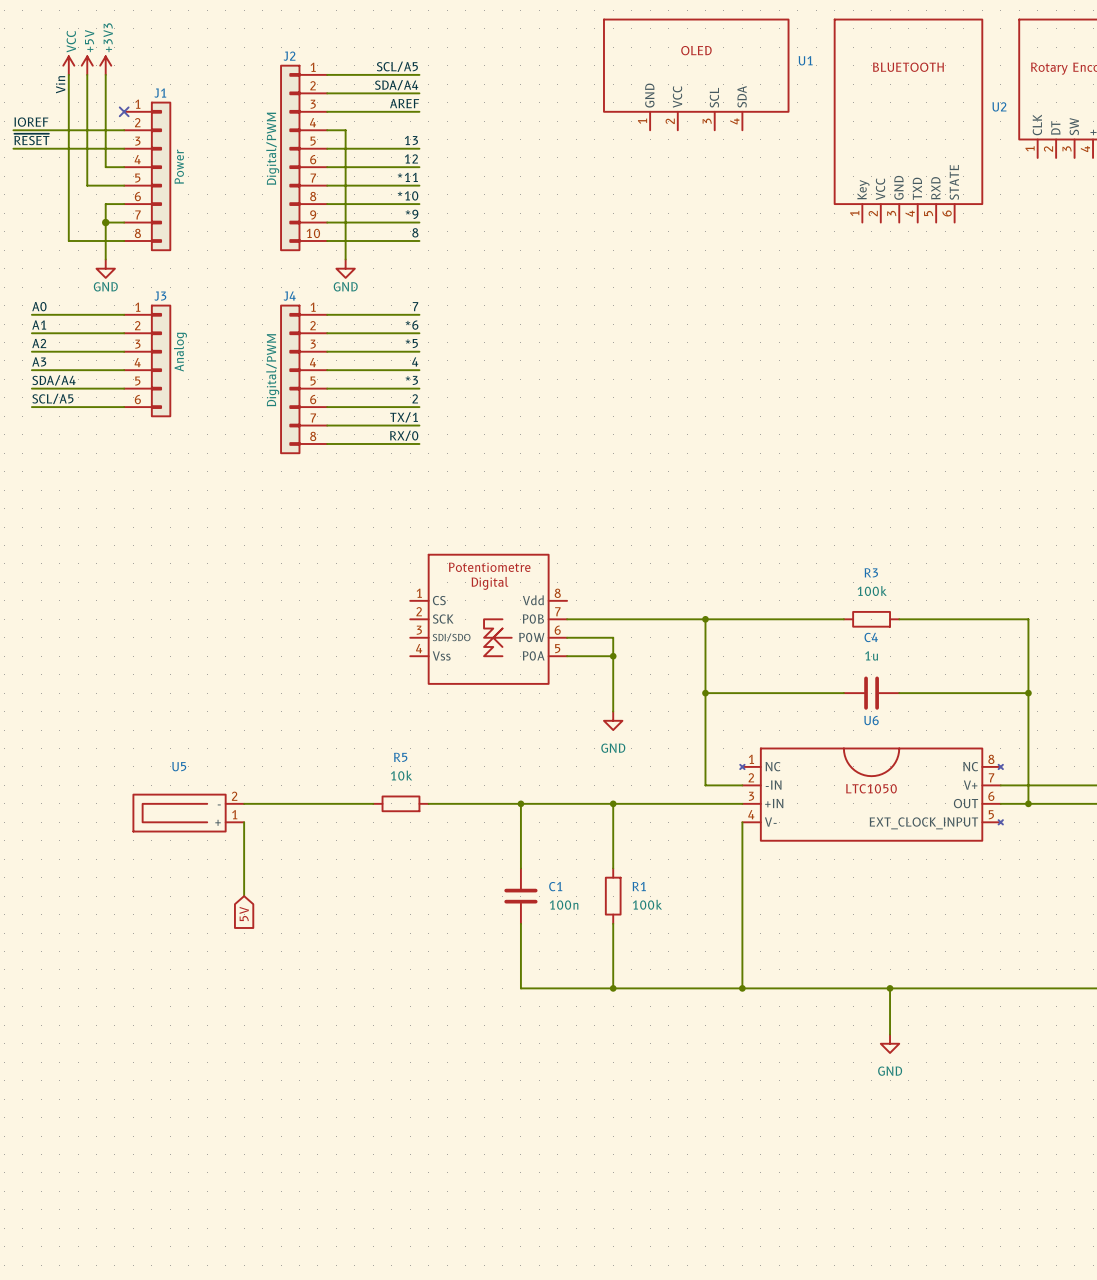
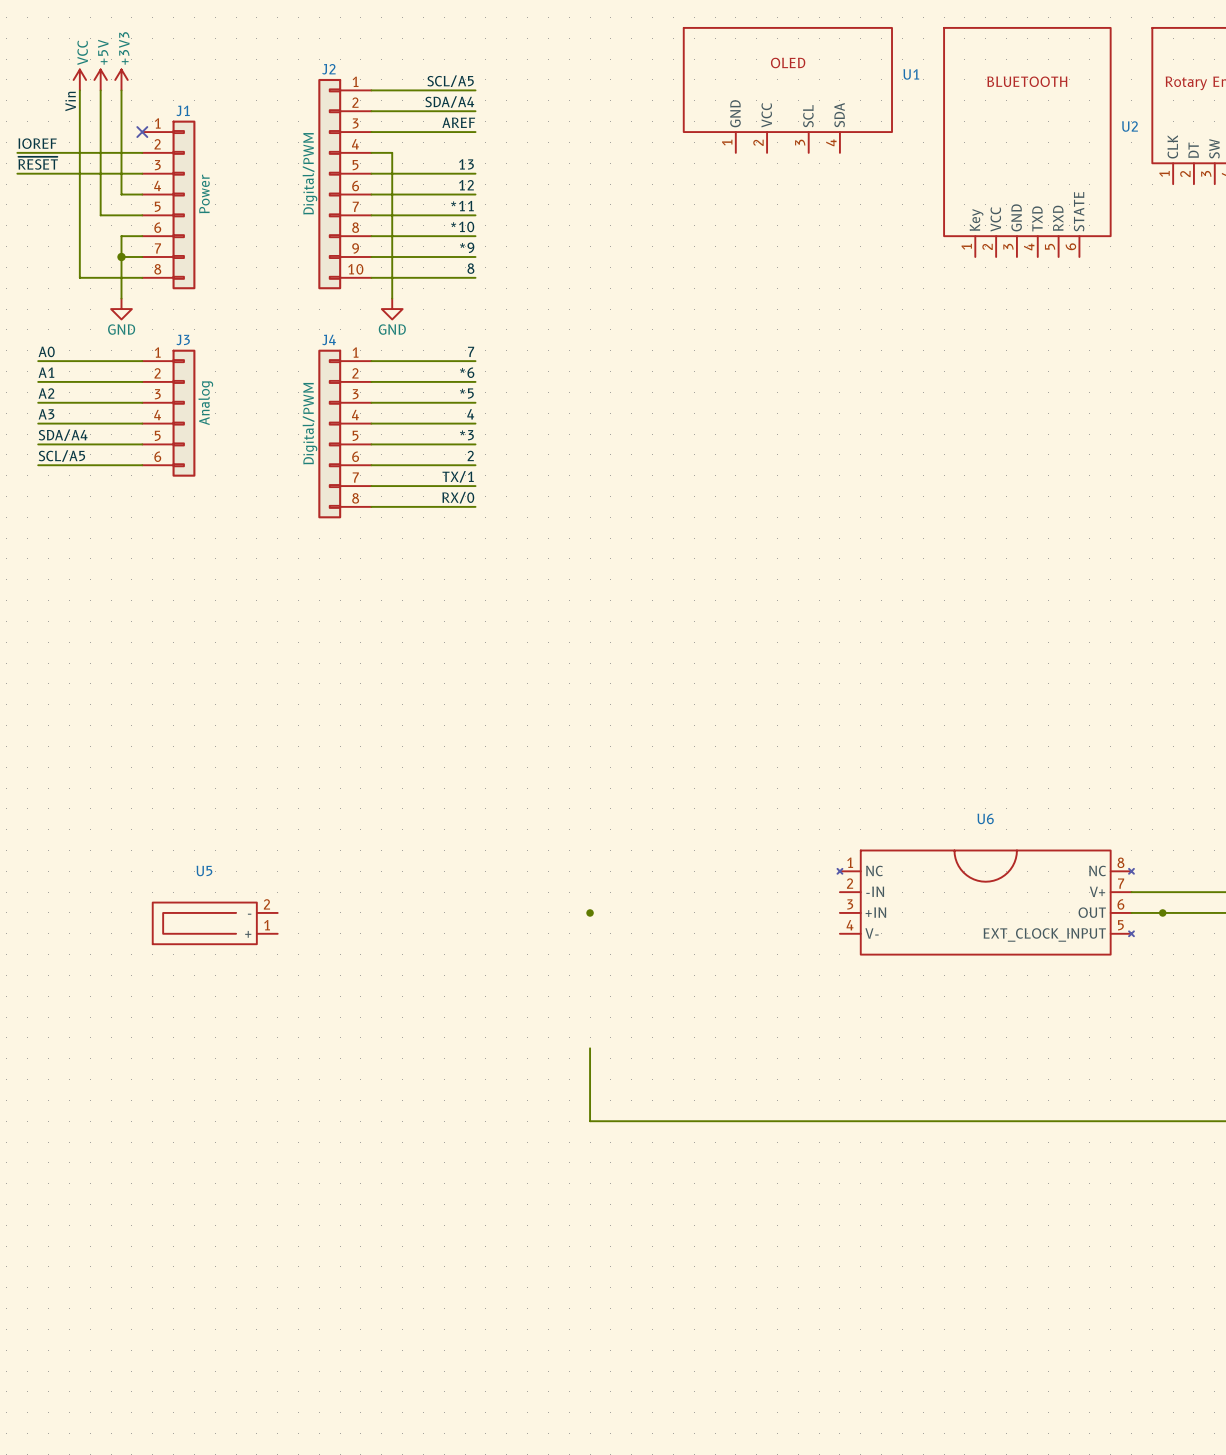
part: (488, 619) -> none
wire: (567, 619) (843, 619) -> none
wire: (705, 619) (705, 785) (742, 785) -> none
junction: (705, 619) -> none
R3: 100k (871, 619) -> none
wire: (899, 619) (1028, 619) (1028, 803) -> none
wire: (567, 637) (613, 637) (613, 711) -> none
wire: (567, 656) (613, 656) -> none
junction: (613, 656) -> none
wire: (705, 693) (843, 693) -> none
junction: (705, 693) -> none
C4: 1u (871, 693) -> none
wire: (899, 693) (1028, 693) -> none
junction: (1028, 693) -> none
power symbol: GND (613, 720) -> none
U6 text: LTC1050 (871, 788) -> none
wire: (244, 803) (373, 803) -> none
R5: 10k (400, 803) -> none
wire: (428, 803) (742, 803) -> none
wire: (520, 803) (520, 868) -> none
wire: (613, 803) (613, 868) -> none
junction: (613, 803) -> none
wire: (244, 822) (244, 896) -> none
wire: (742, 822) (742, 988) -> none
C1: 100n (520, 896) -> none
R1: 100k (613, 896) -> none
global label: 5V (244, 913) -> none
wire: (613, 923) (613, 988) -> none
junction: (613, 988) -> none
junction: (742, 988) -> none
wire: (890, 988) (890, 1034) -> none
junction: (890, 988) -> none
power symbol: GND (890, 1043) -> none

